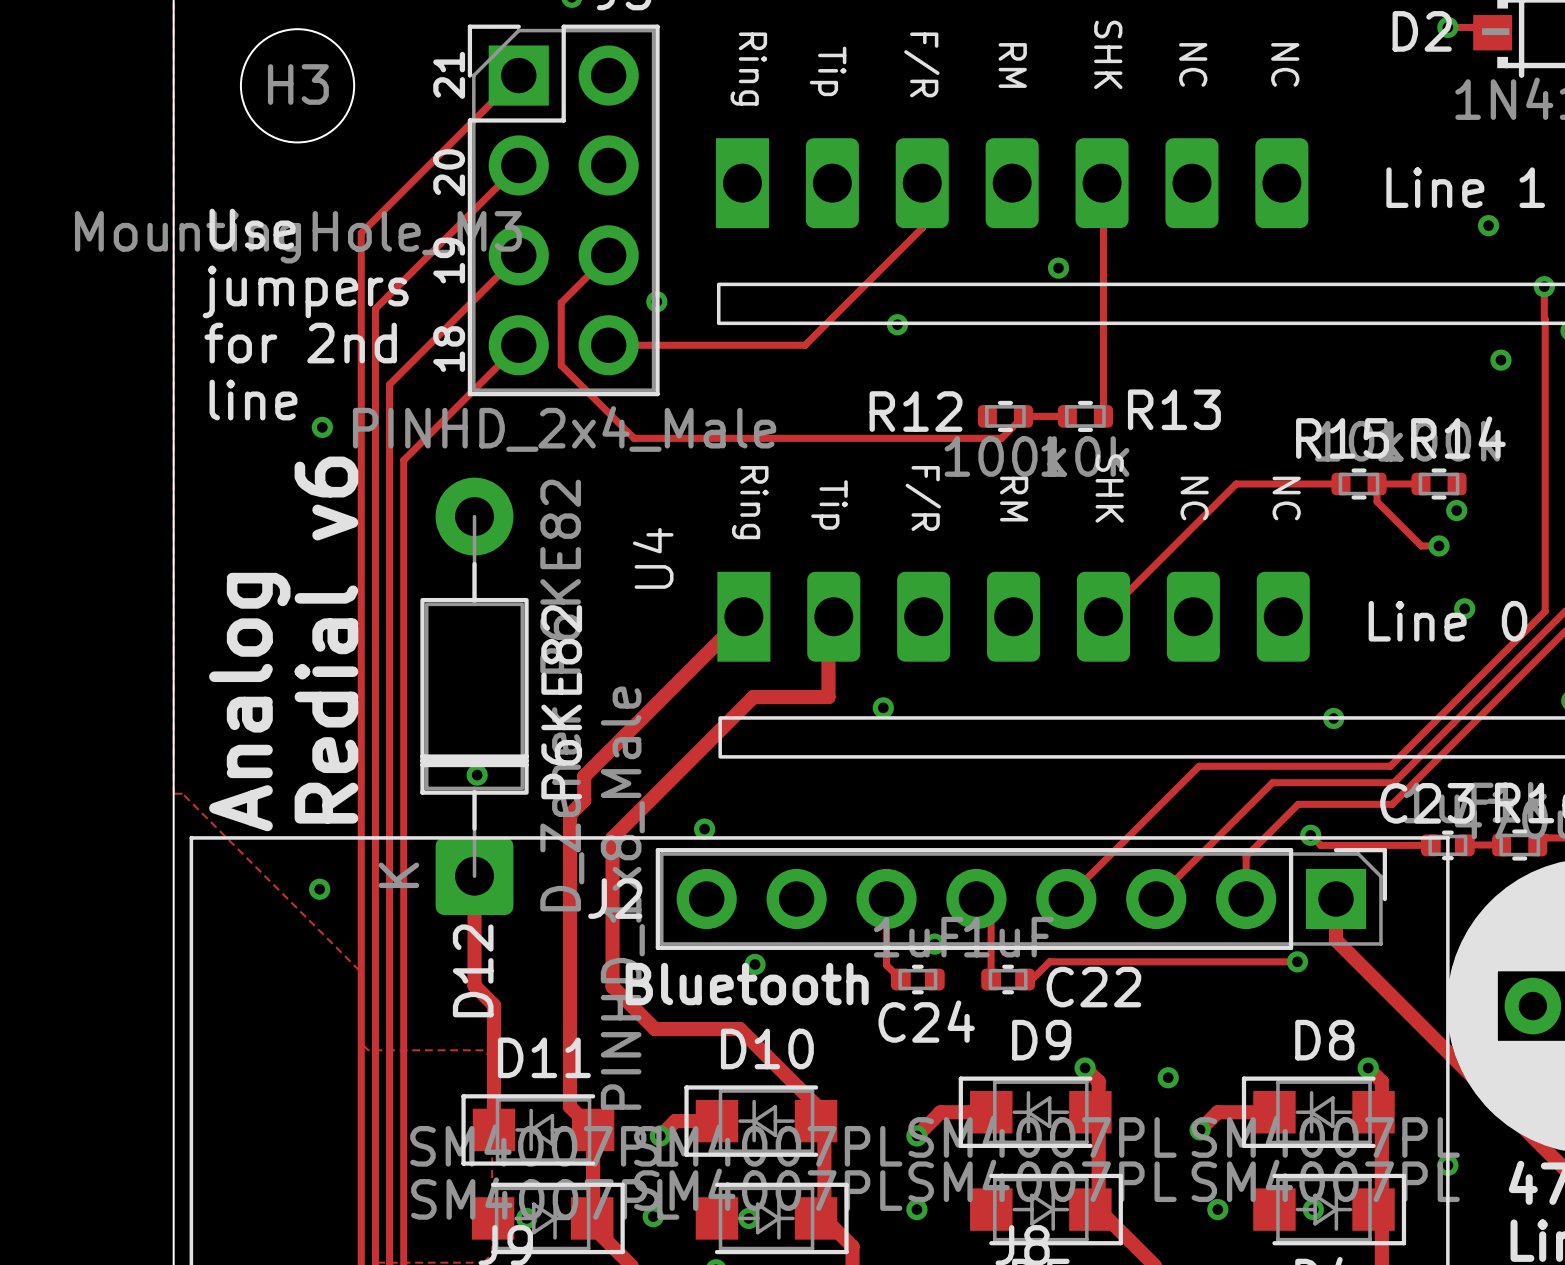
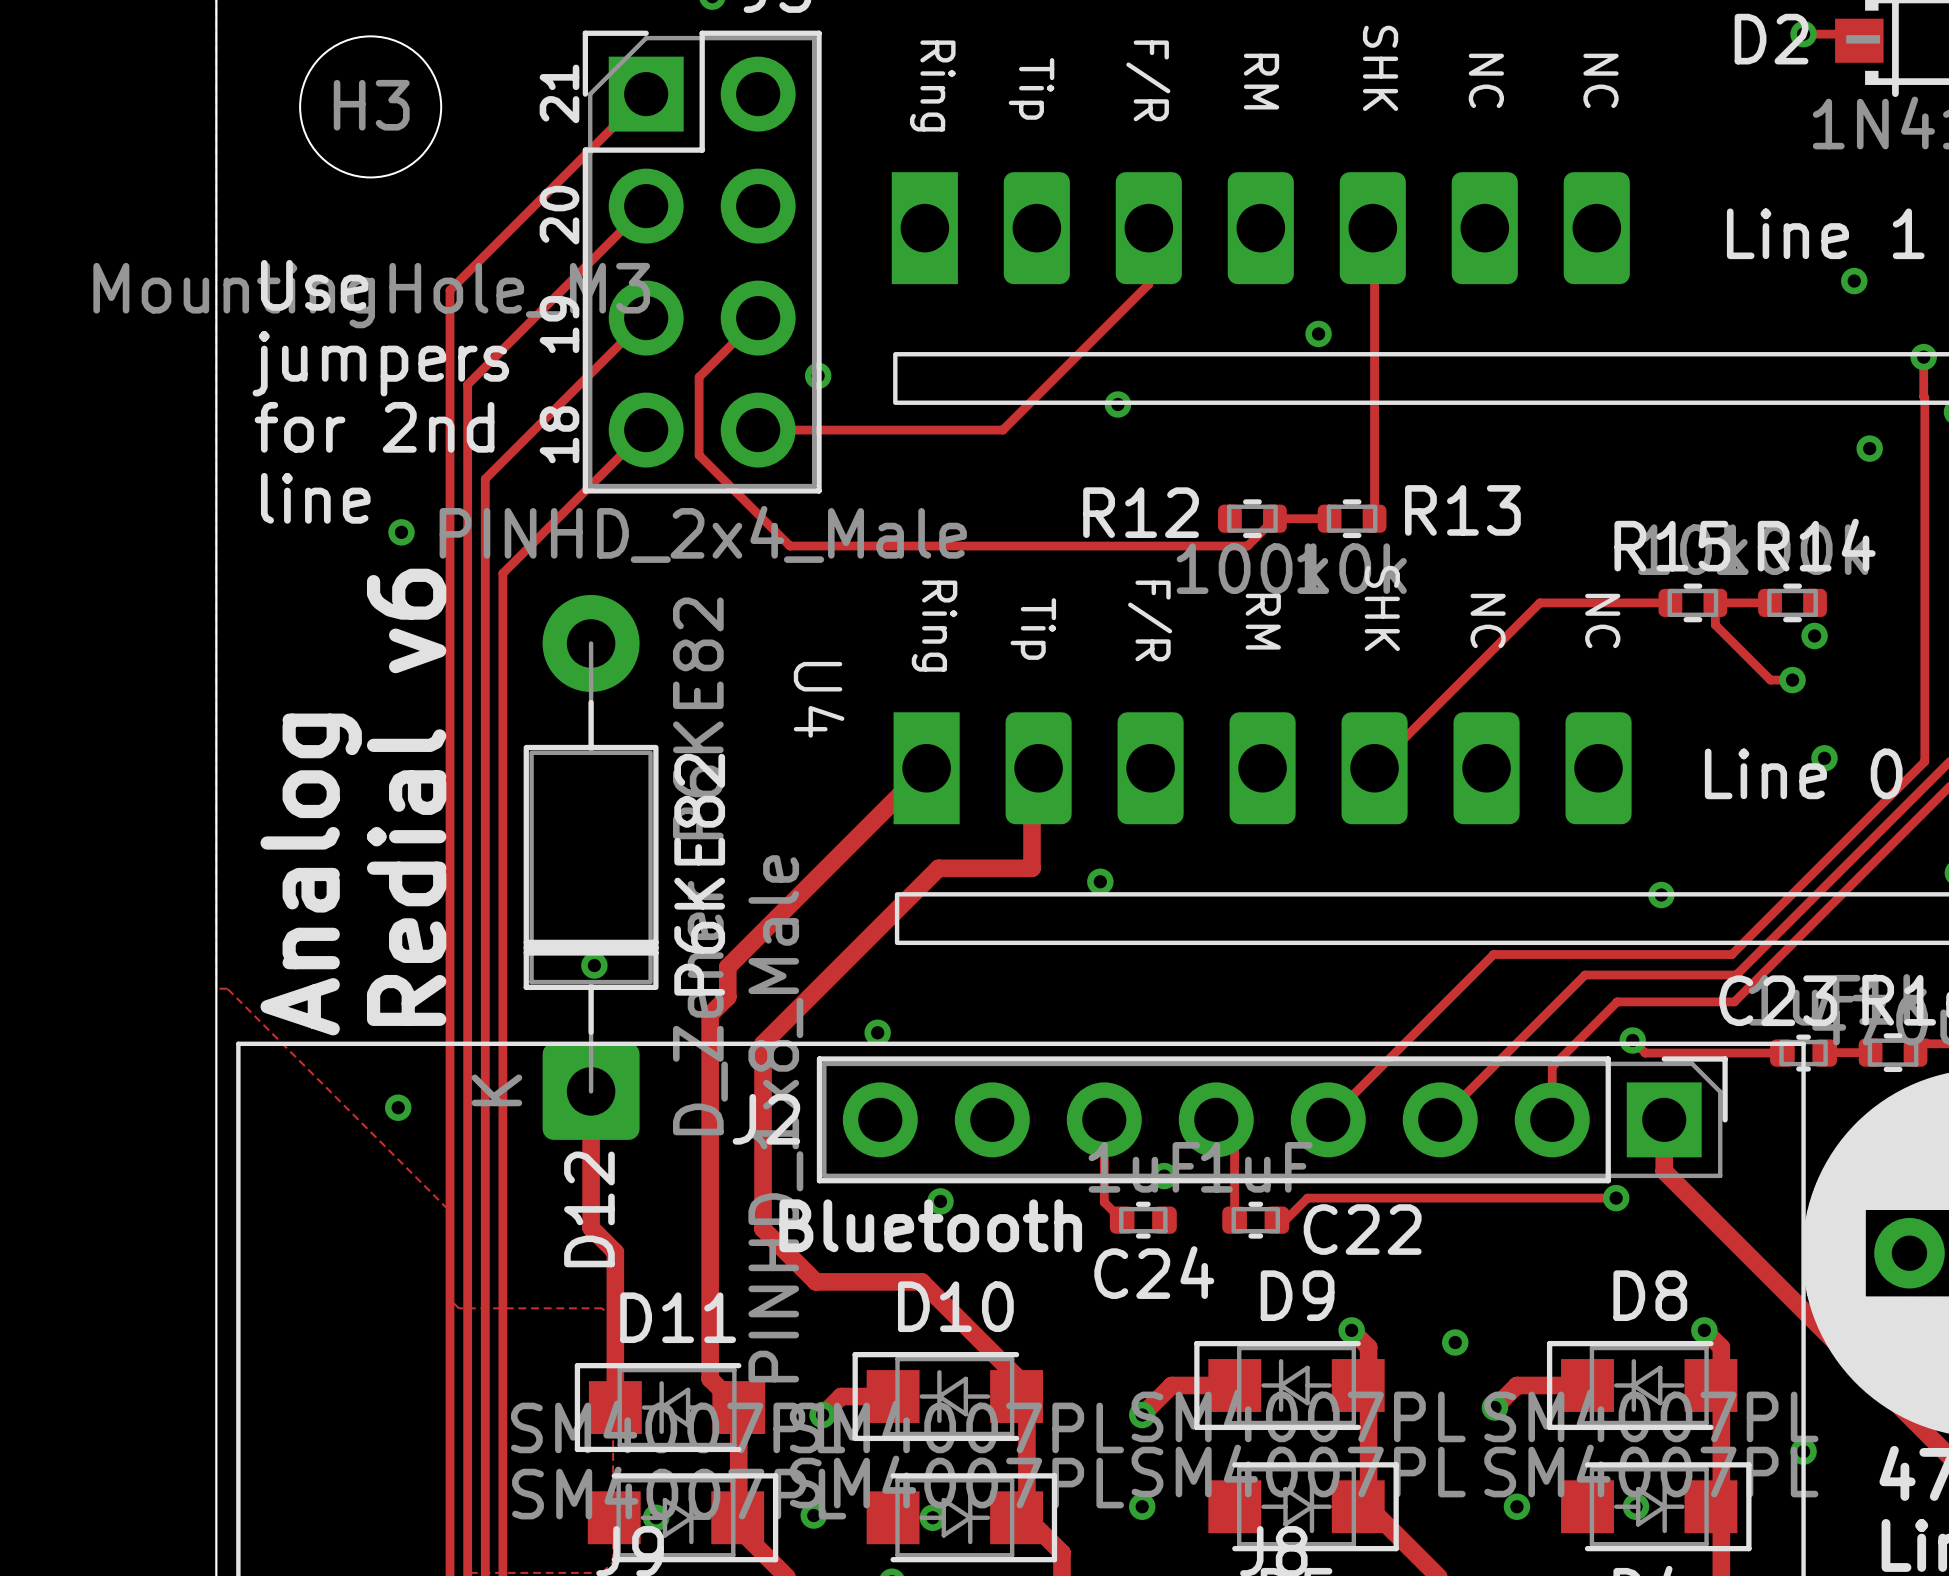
U4 name rotation: 0° (653, 558) -> 180° (819, 699)

